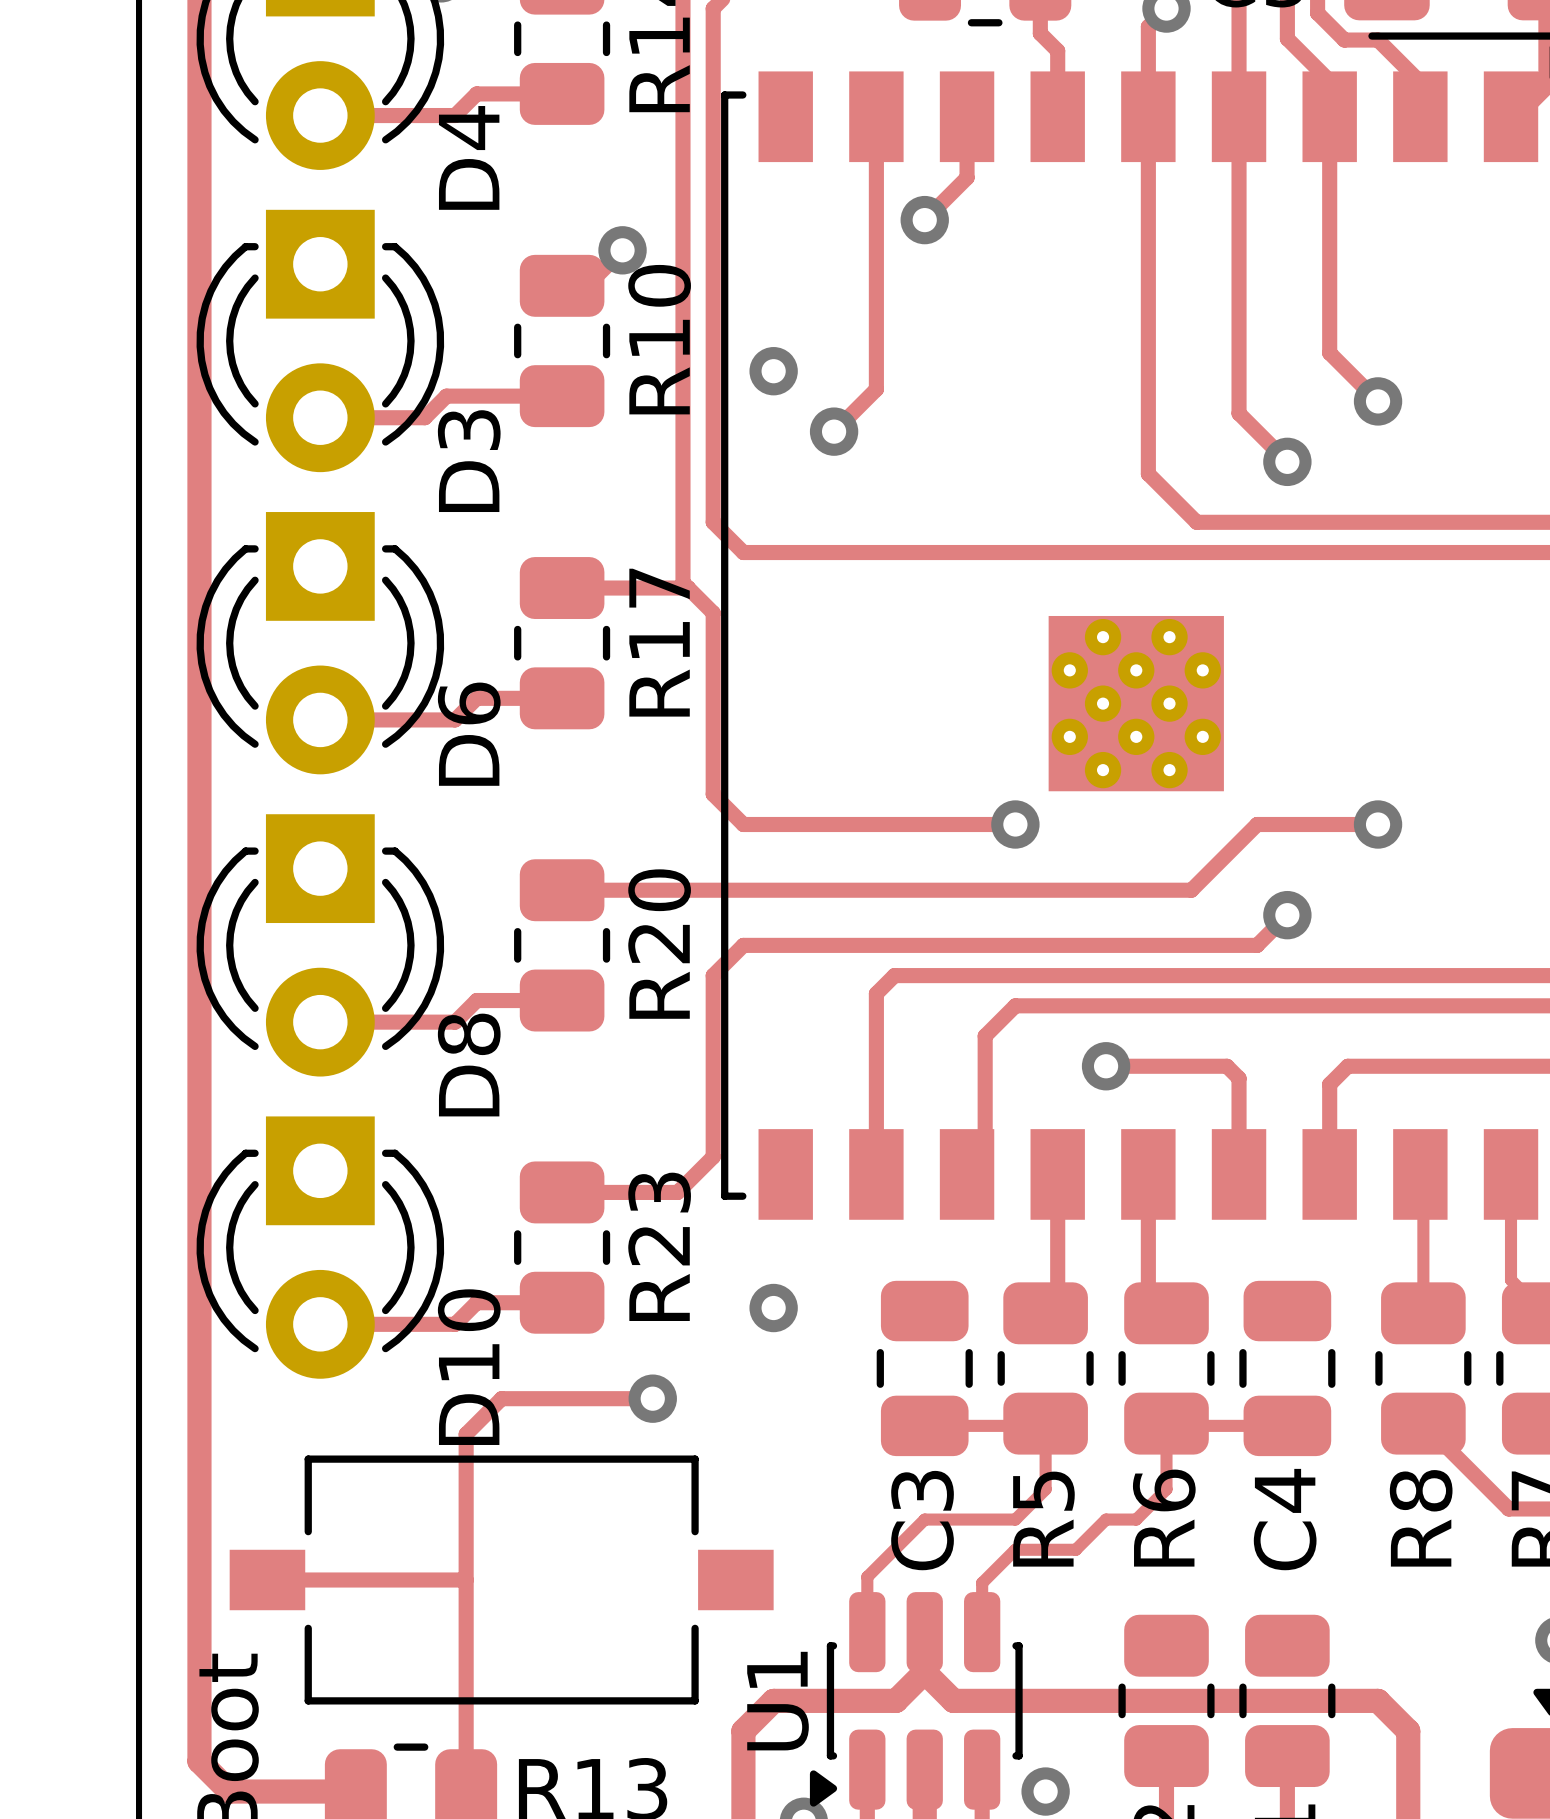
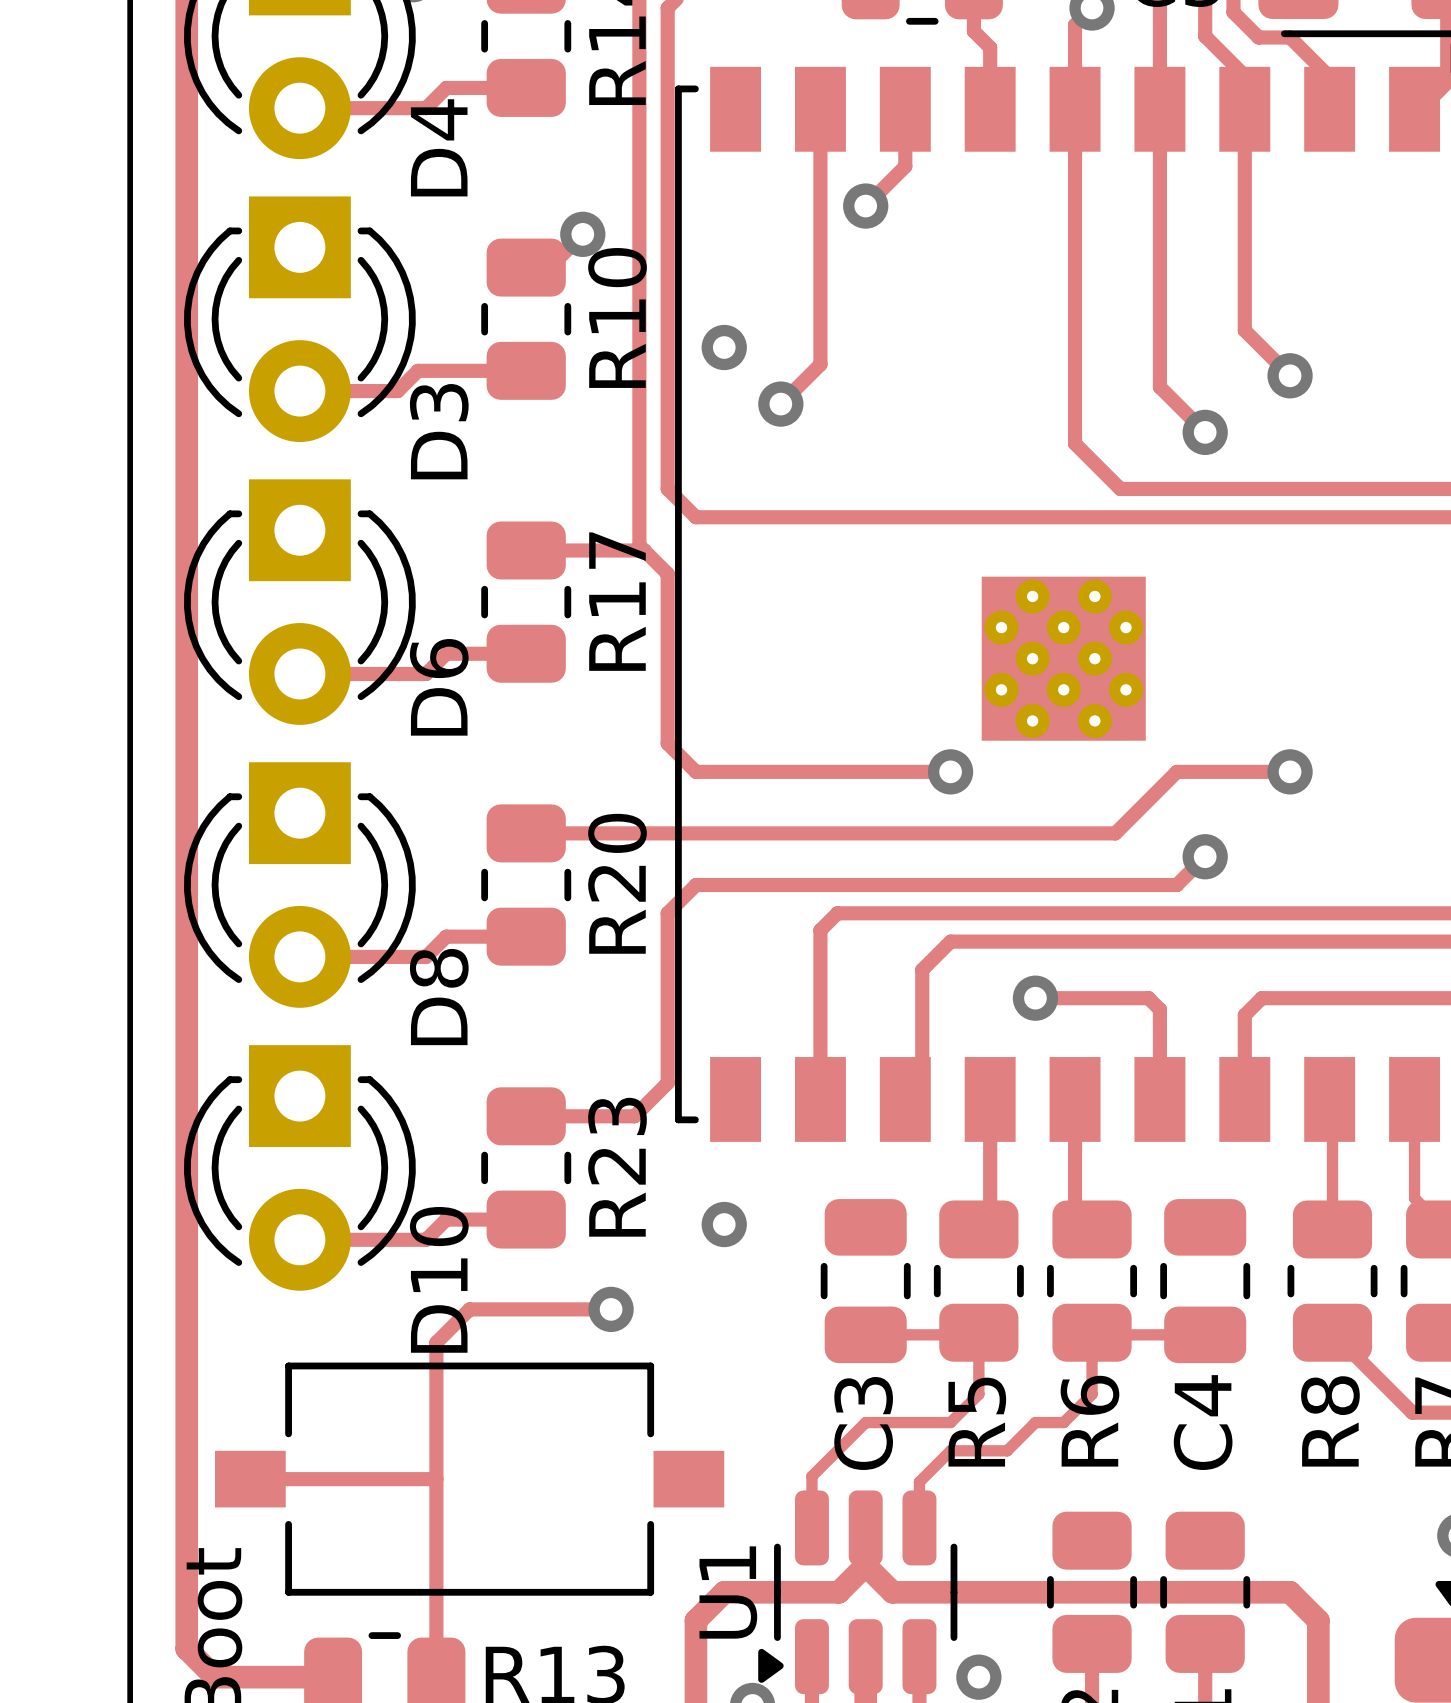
U1 footprint: [809, 1592, 1023, 1810] -> [758, 1490, 958, 1695]

